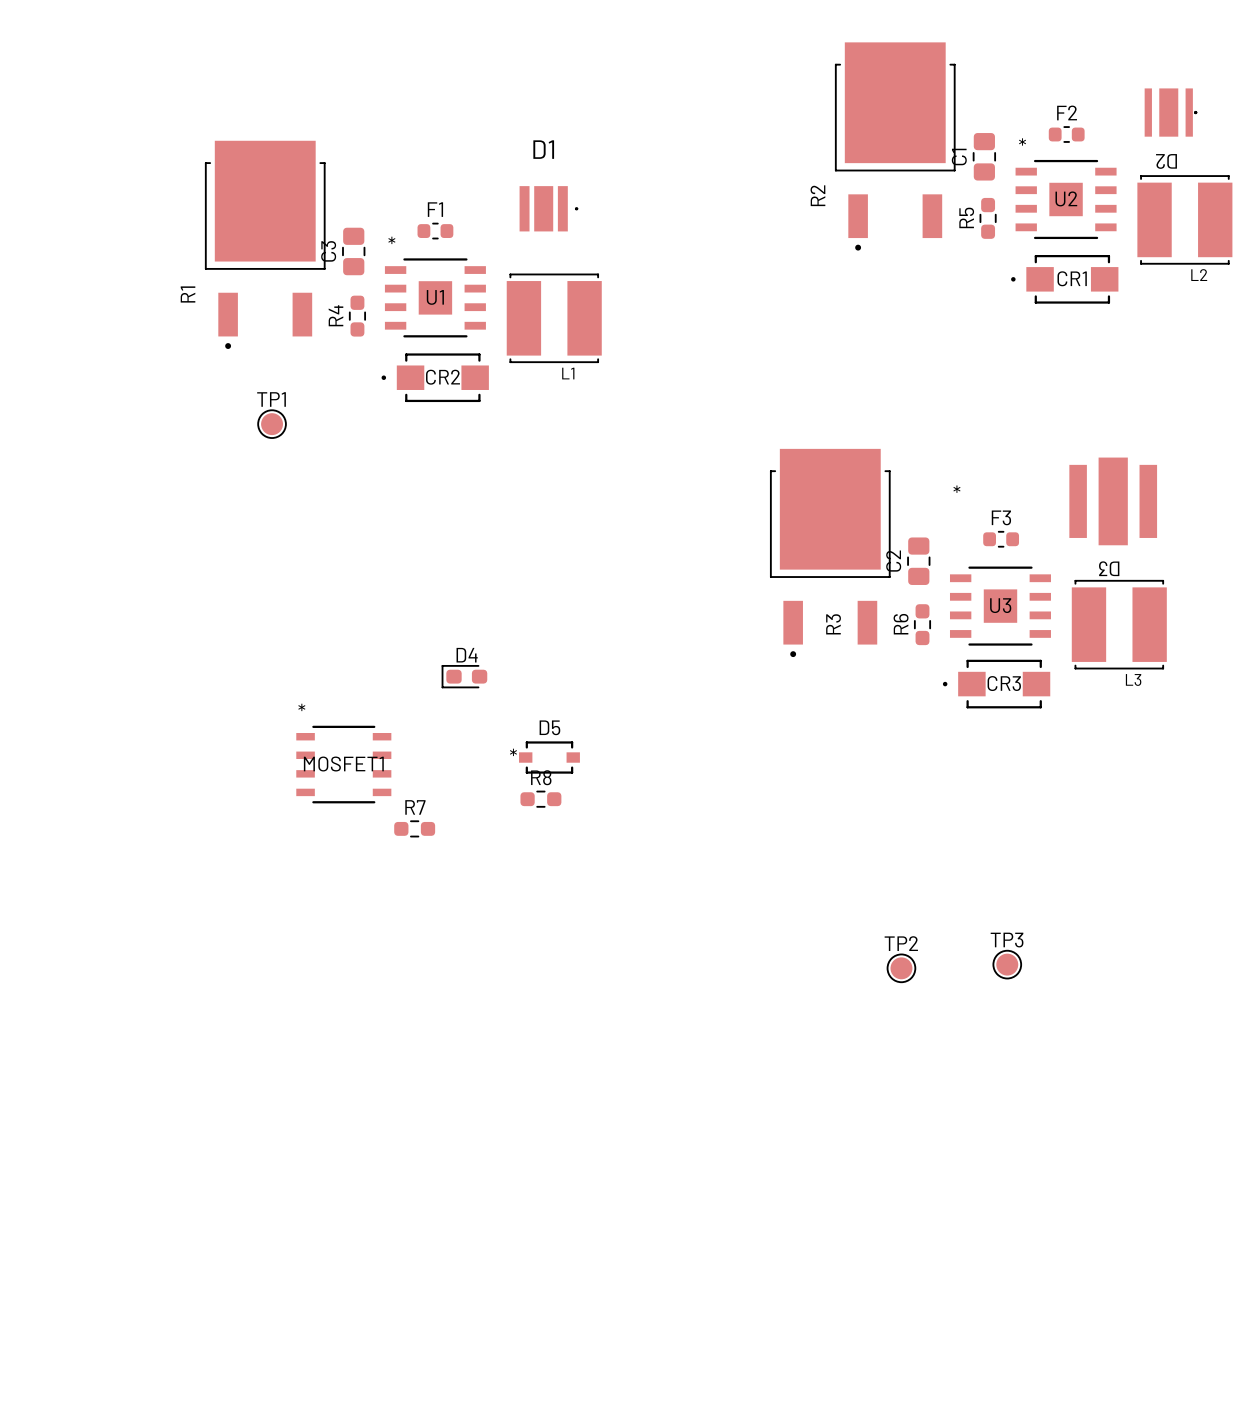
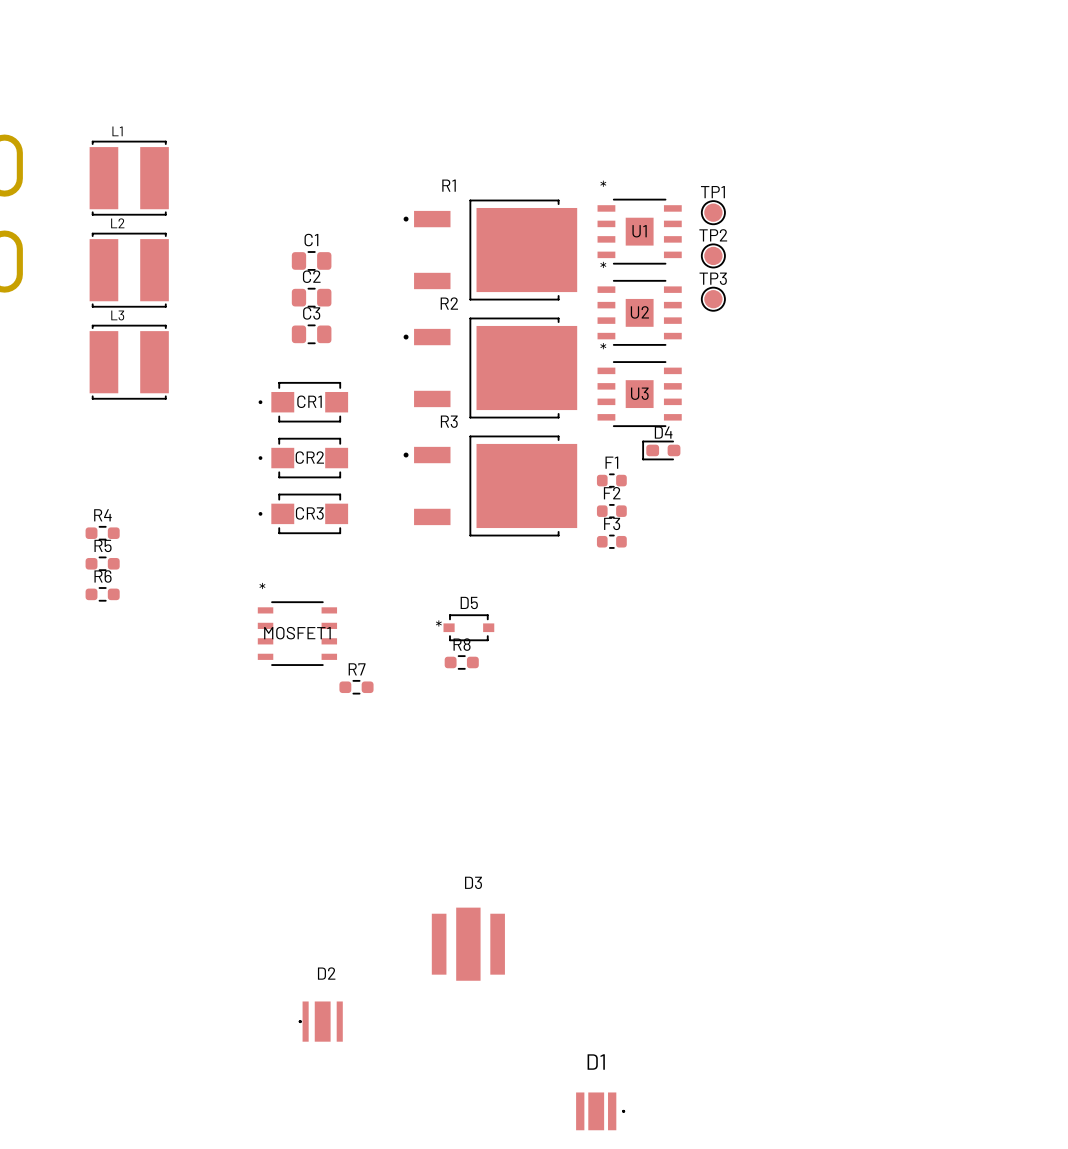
D2 rotation: 0° (1170, 112) -> 180° (320, 1021)
D2 position: (1170, 112) -> (320, 1021)
F2 position: (1066, 134) -> (611, 511)
R2 rotation: 0° (895, 146) -> 90° clockwise (490, 368)
R2 position: (895, 146) -> (490, 368)
C1 rotation: 0° (984, 156) -> 90° clockwise (311, 260)
C1 position: (984, 156) -> (311, 260)
U2 position: (1066, 199) -> (639, 312)
D1 position: (548, 208) -> (600, 1111)
R5 rotation: 0° (988, 218) -> 90° clockwise (102, 563)
R5 position: (988, 218) -> (102, 563)
L2 position: (1184, 219) -> (129, 270)
F1 position: (435, 231) -> (611, 480)
R1 rotation: 0° (265, 244) -> 90° clockwise (490, 250)
R1 position: (265, 244) -> (490, 250)
C3 rotation: 0° (353, 251) -> 90° clockwise (311, 334)
C3 position: (353, 251) -> (311, 334)
L2 name position: L2 (1199, 275) -> L2 (117, 223)
CR1 position: (1064, 279) -> (303, 402)
U1 position: (435, 297) -> (639, 231)
R4 rotation: 0° (357, 316) -> 90° clockwise (102, 533)
R4 position: (357, 316) -> (102, 533)
L1 position: (554, 318) -> (129, 178)
L1 name position: L1 (568, 373) -> L1 (117, 131)
CR2 position: (435, 377) -> (303, 458)
TP1 position: (272, 424) -> (713, 212)
U3 text position: * (956, 489) -> * (603, 346)
D3 position: (1113, 501) -> (468, 944)
F3 position: (1001, 539) -> (611, 541)
R3 rotation: 0° (830, 552) -> 90° clockwise (490, 485)
R3 position: (830, 552) -> (490, 485)
C2 rotation: 0° (918, 561) -> 90° clockwise (311, 297)
C2 position: (918, 561) -> (311, 297)
D3 name rotation: 0° (1109, 568) -> 180° (473, 882)
D3 name position: D3 (1109, 568) -> D3 (473, 882)
U3 position: (1000, 606) -> (639, 394)
R3 name position: R3 (833, 624) -> R3 (449, 421)
R6 rotation: 0° (922, 624) -> 90° clockwise (102, 594)
R6 position: (922, 624) -> (102, 594)
L3 position: (1119, 624) -> (129, 362)
D4 position: (464, 676) -> (661, 450)
L3 name position: L3 (1133, 679) -> L3 (117, 315)
CR3 position: (996, 684) -> (303, 513)
TP3 position: (1007, 964) -> (713, 299)
TP2 position: (901, 968) -> (713, 255)

